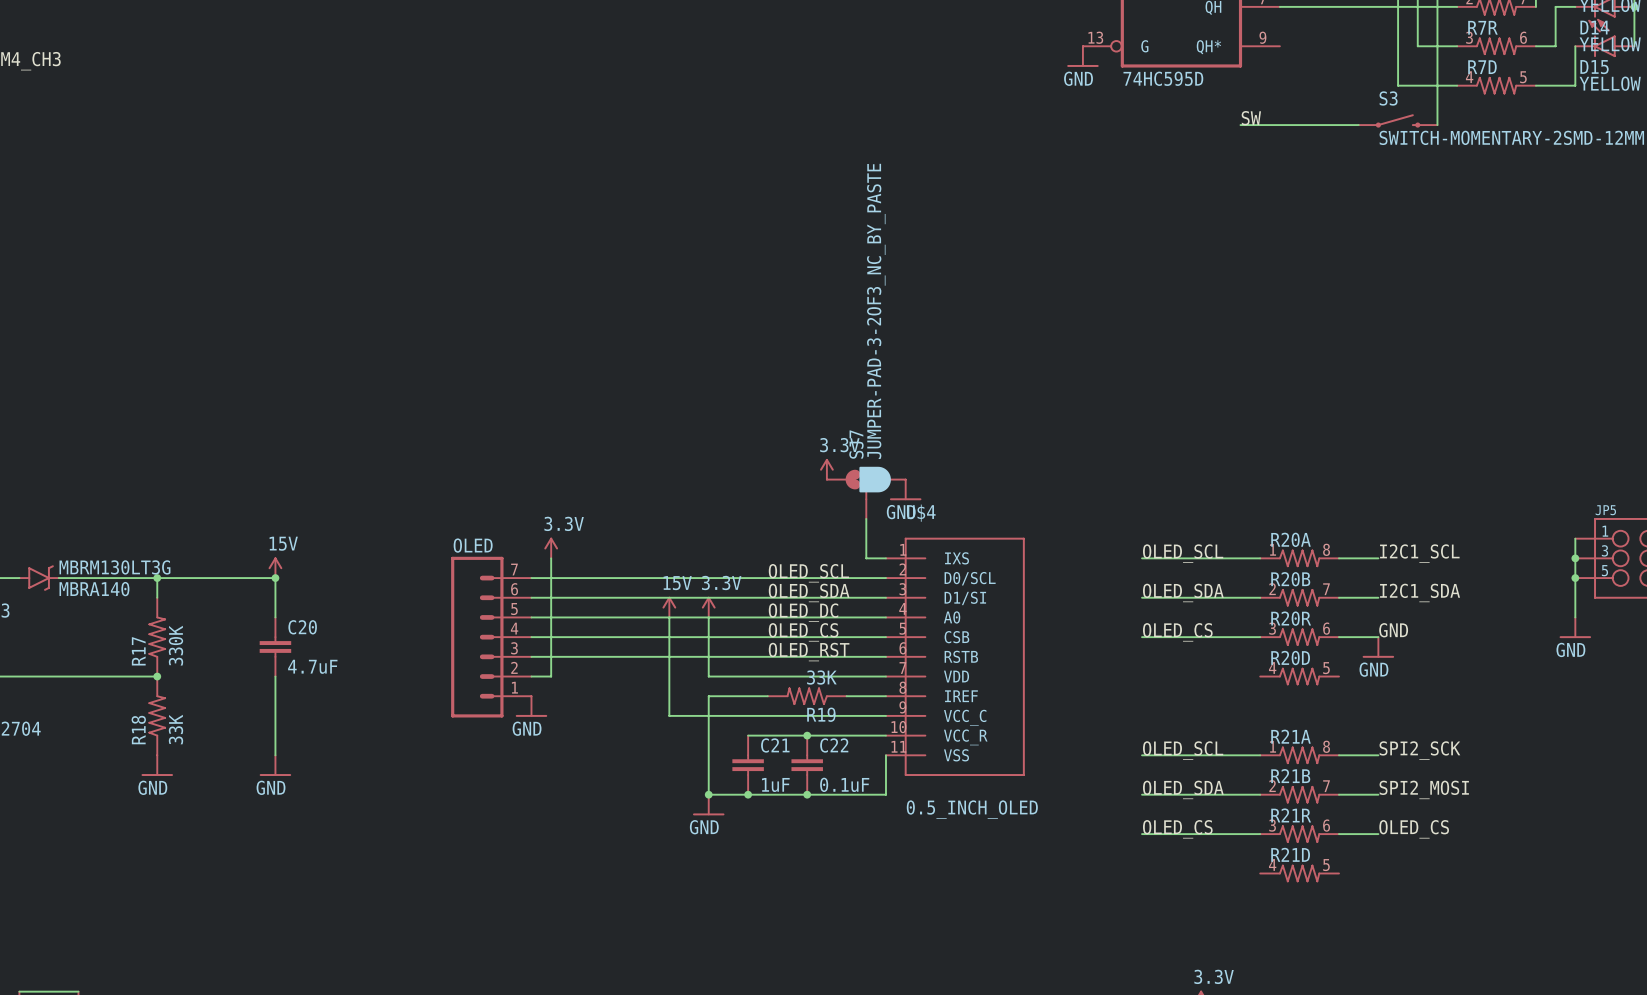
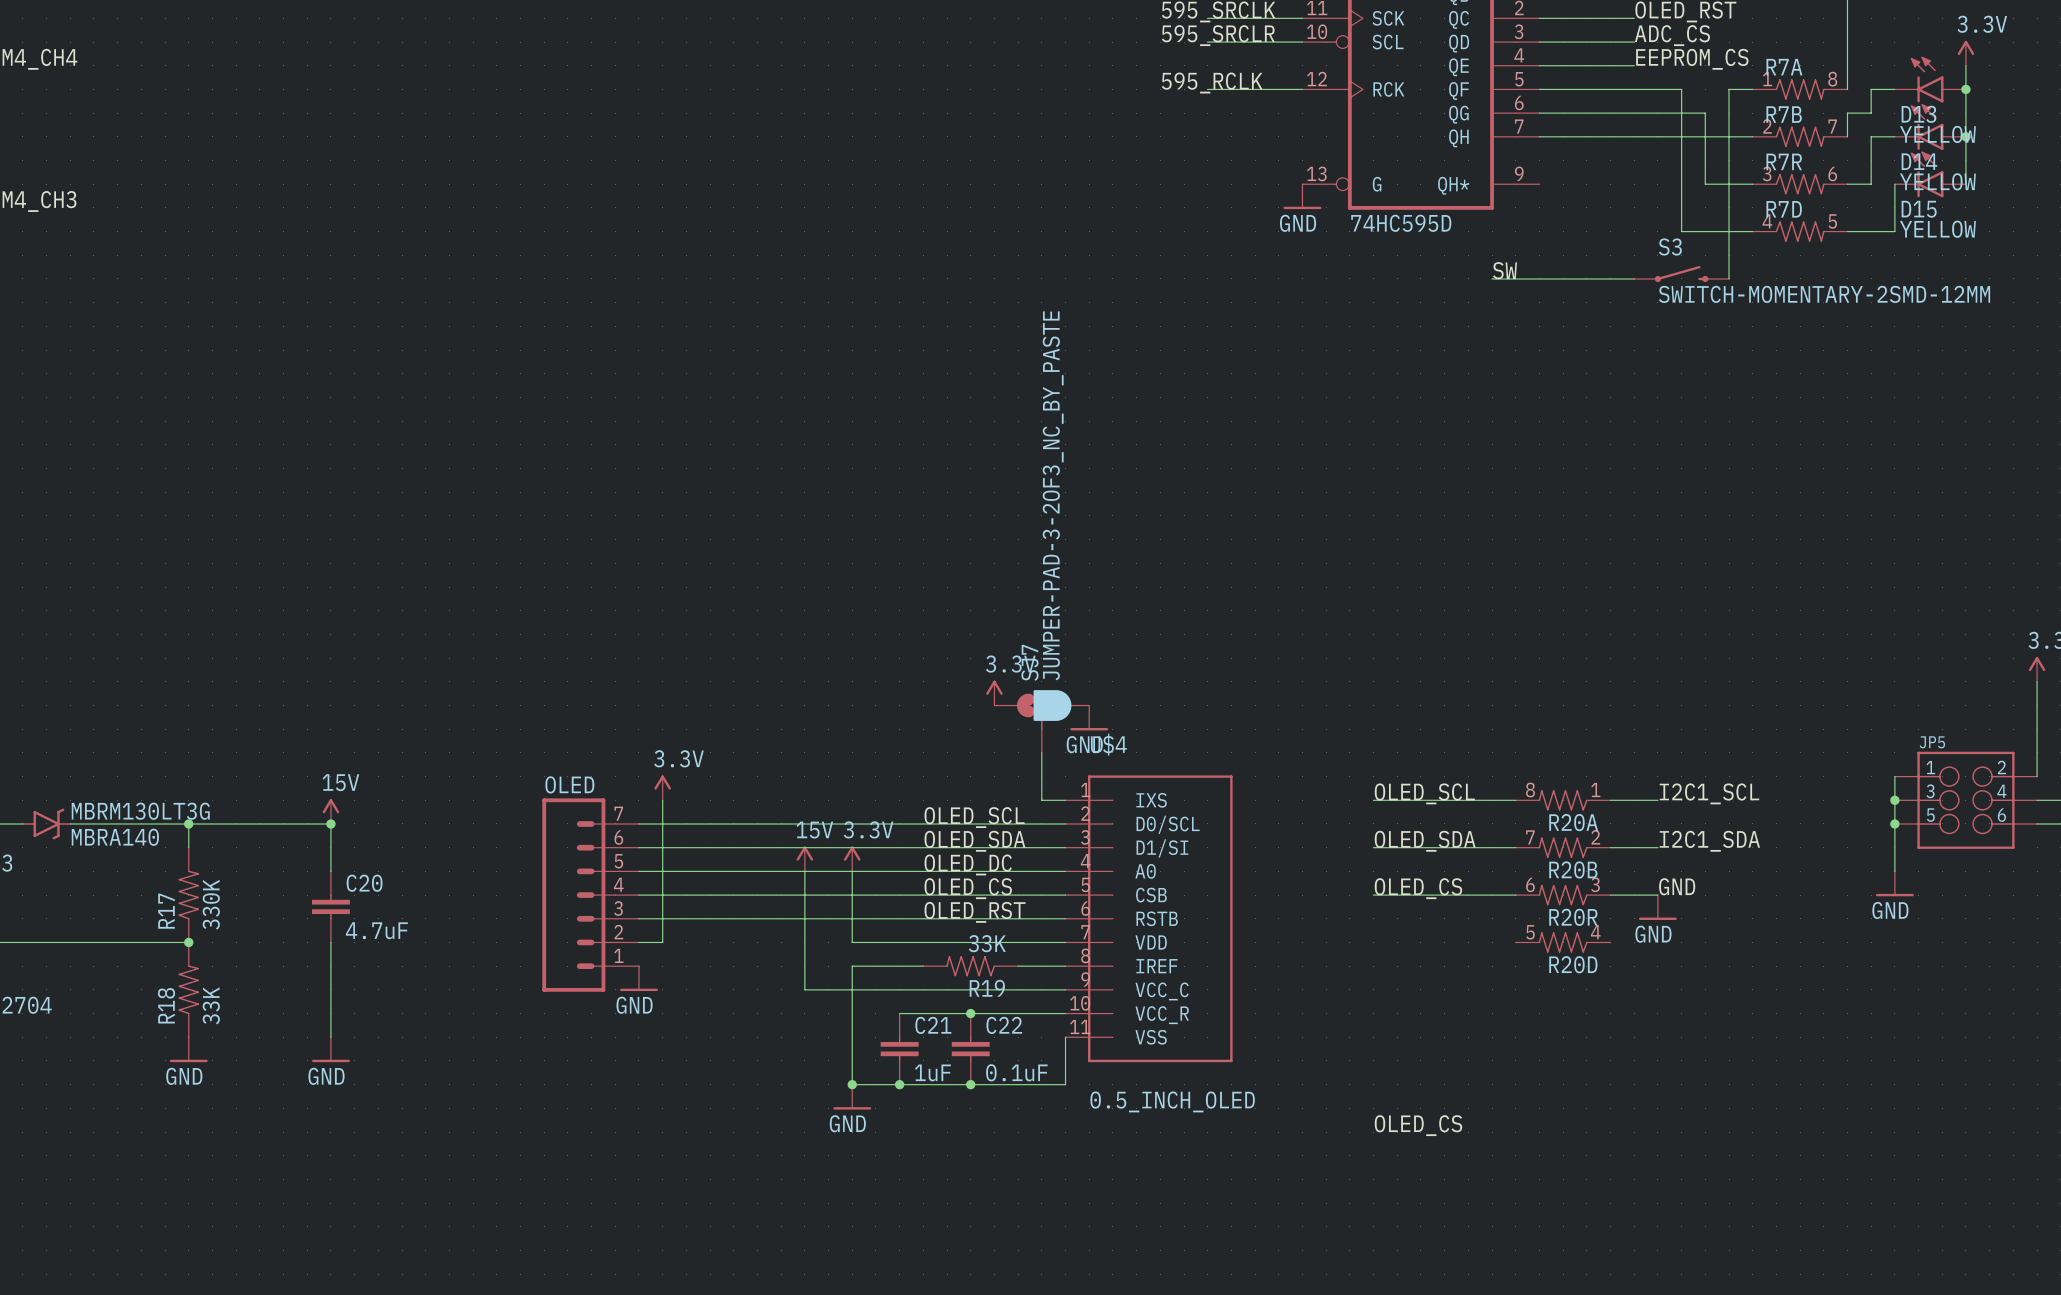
R20A rotation: 0° (1299, 558) -> 180° (1563, 800)
R20B rotation: 0° (1299, 597) -> 180° (1563, 847)
R20R rotation: 0° (1299, 637) -> 180° (1563, 895)
R20D rotation: 0° (1299, 676) -> 180° (1563, 942)
label: OLED_SCL (1183, 750) -> none
label: SPI2_SCK (1419, 750) -> none
wire: (1142, 755) (1260, 755) -> none
R21A: (1299, 755) -> none
wire: (1338, 755) (1378, 755) -> none
label: OLED_SDA (1183, 789) -> none
label: SPI2_MOSI (1424, 789) -> none
wire: (1142, 794) (1260, 794) -> none
R21B: (1299, 794) -> none
wire: (1338, 794) (1378, 794) -> none
label: OLED_CS (1414, 829) -> none
wire: (1142, 834) (1260, 834) -> none
R21R: (1299, 834) -> none
wire: (1338, 834) (1378, 834) -> none
R21D: (1299, 873) -> none

